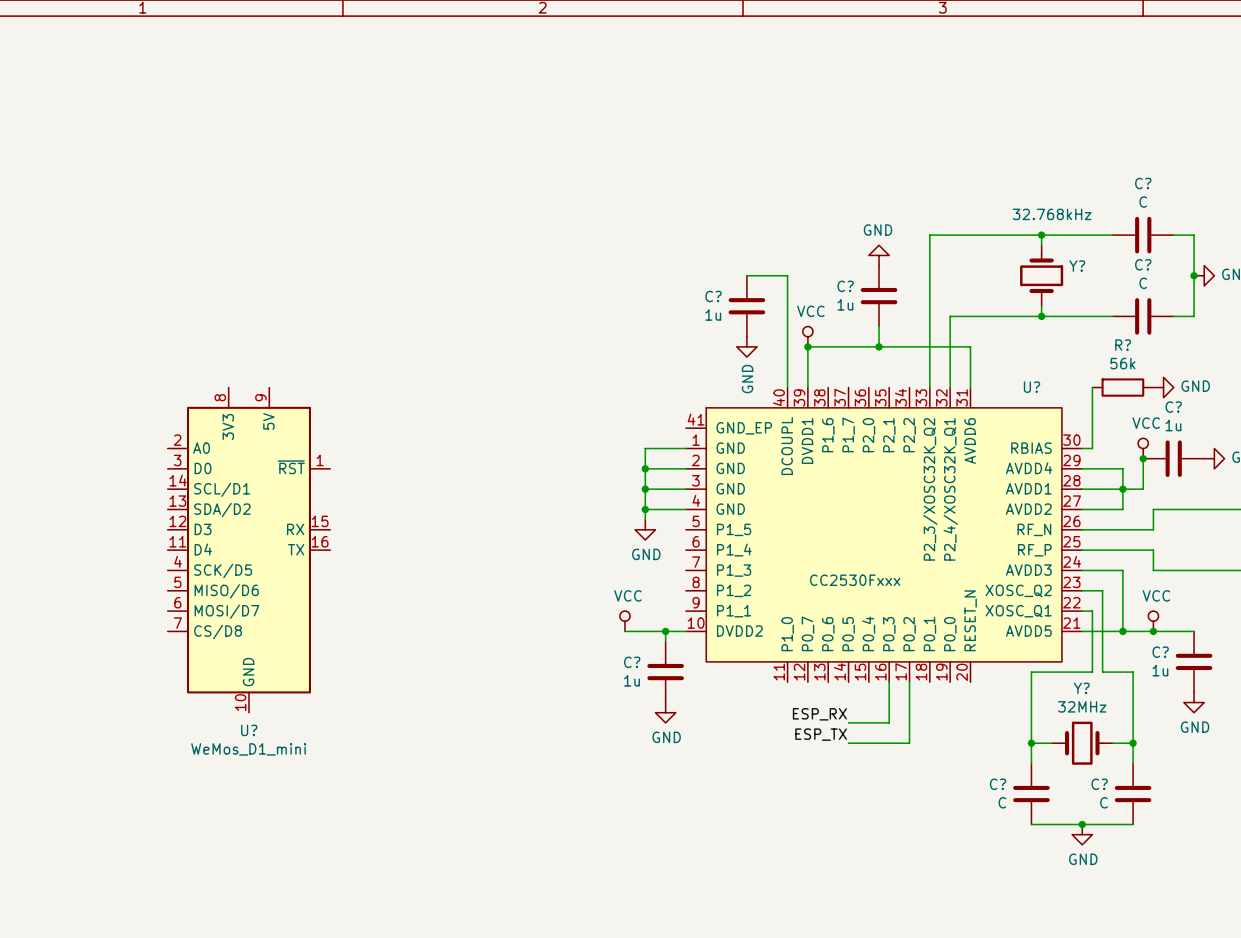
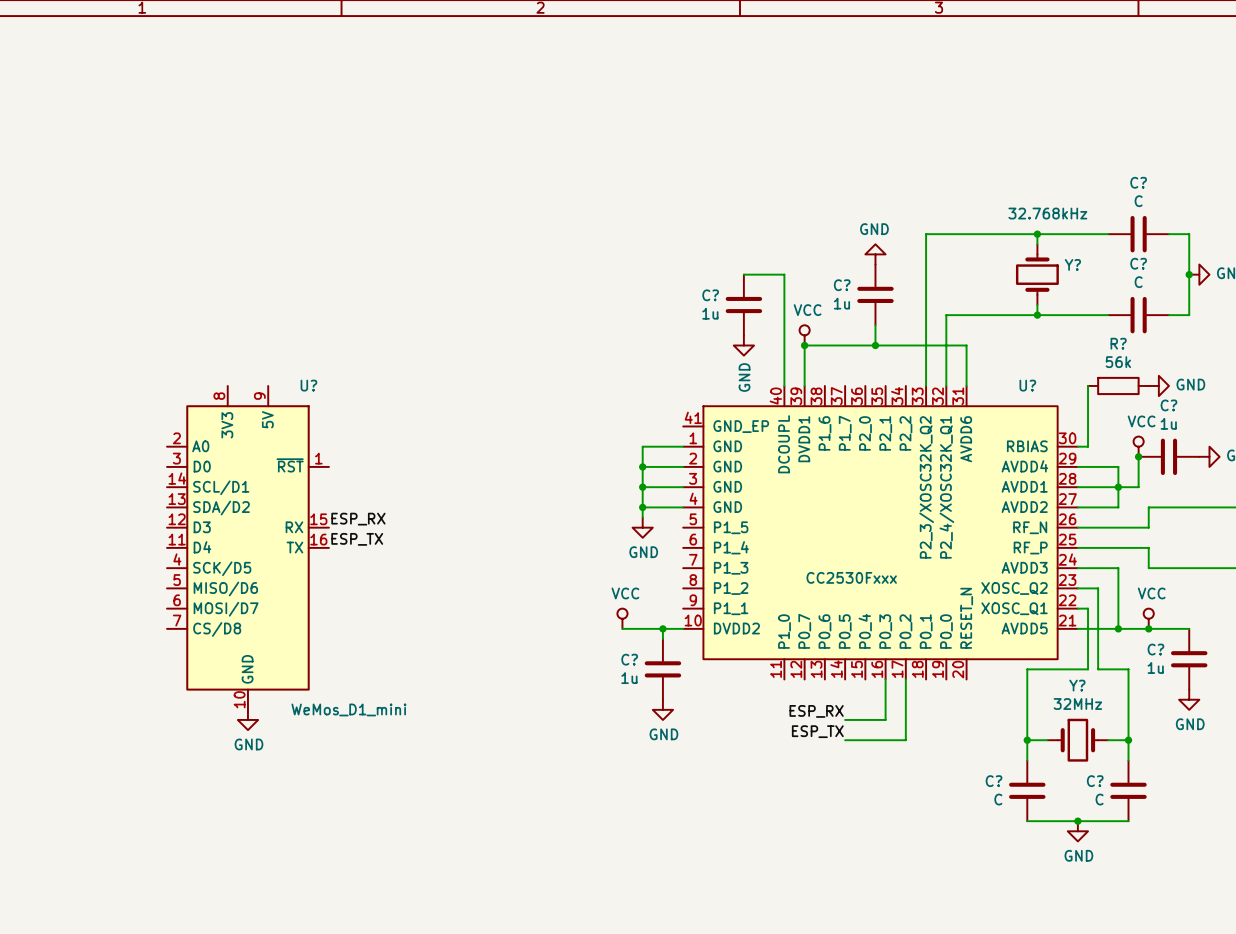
label: none -> ESP_RX (358, 519)
label: none -> ESP_TX (357, 539)
power symbol: none -> GND (247, 719)
U? name position: U? (249, 730) -> U? (308, 385)
U? value position: WeMos_D1_mini (248, 749) -> WeMos_D1_mini (348, 709)

